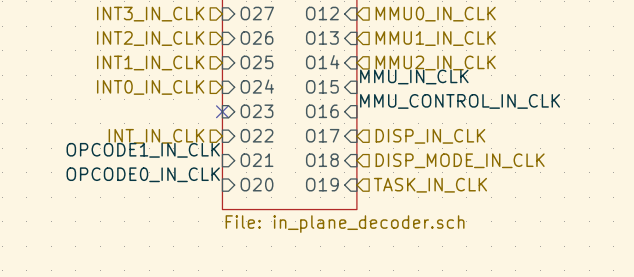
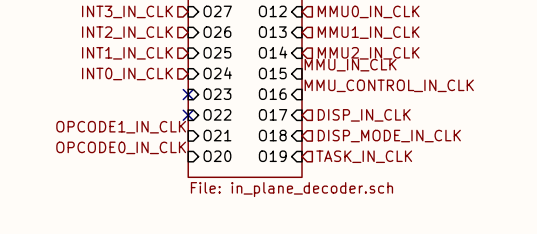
hierarchical label: INT_IN_CLK (156, 136) -> none
no-connect mark: none -> (188, 115)

